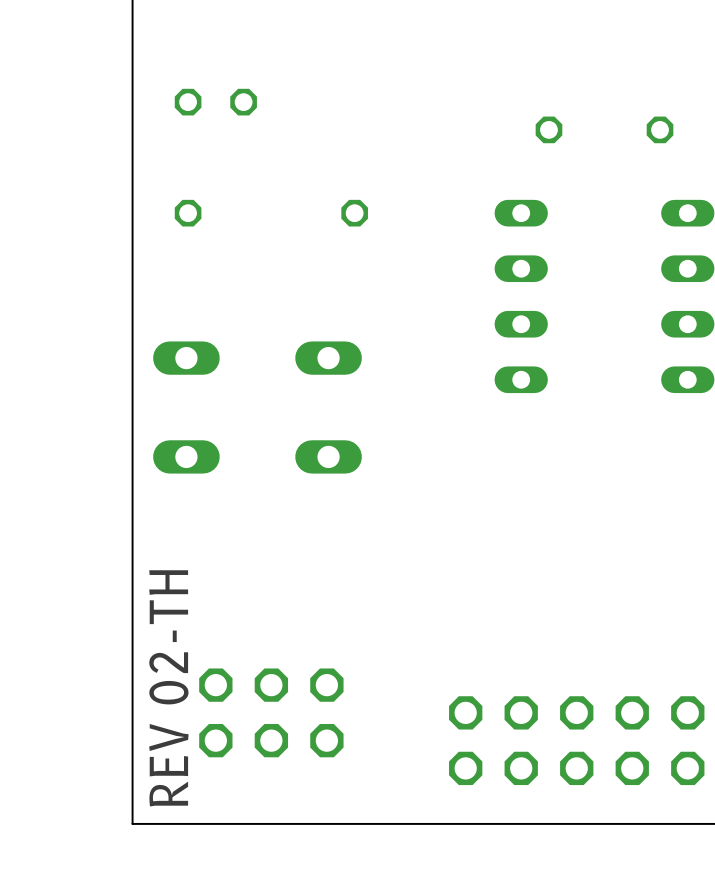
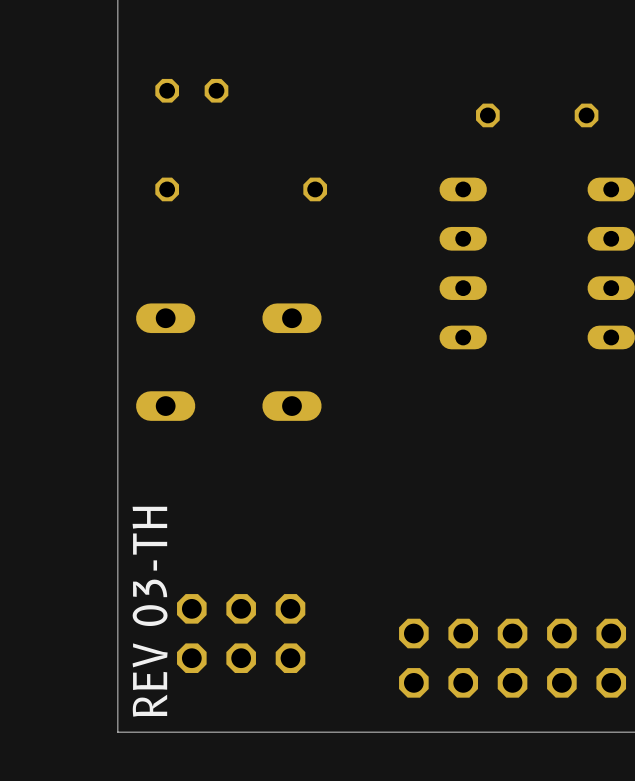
text: REV 02-TH (168, 688) -> REV 03-TH (150, 611)

